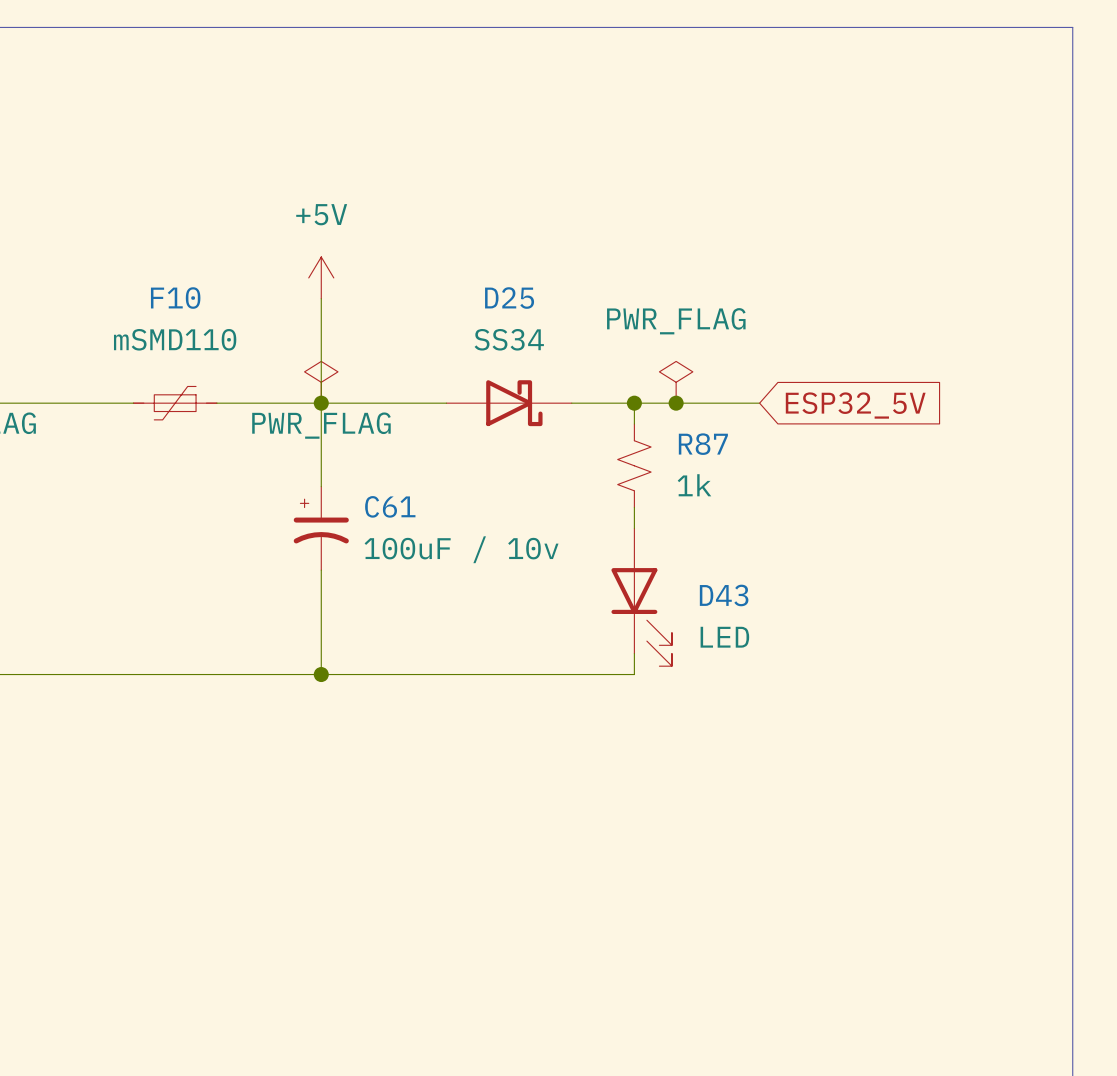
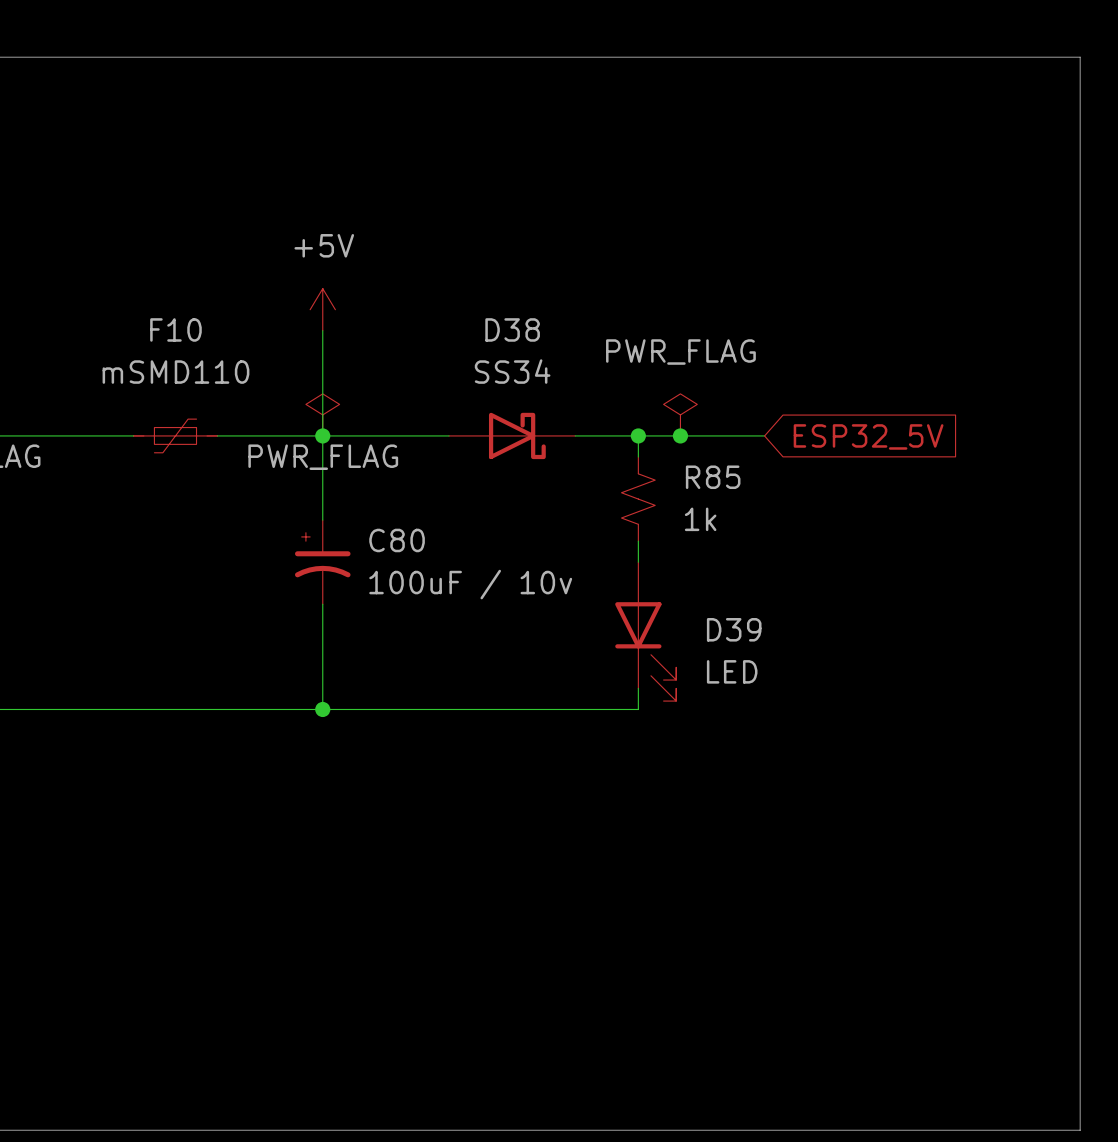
D25 name: D25 (509, 298) -> D38 (512, 329)
R87 name: R87 (703, 444) -> R85 (713, 477)
C61 name: C61 (390, 506) -> C80 (397, 540)
D43 name: D43 (724, 595) -> D39 (734, 629)

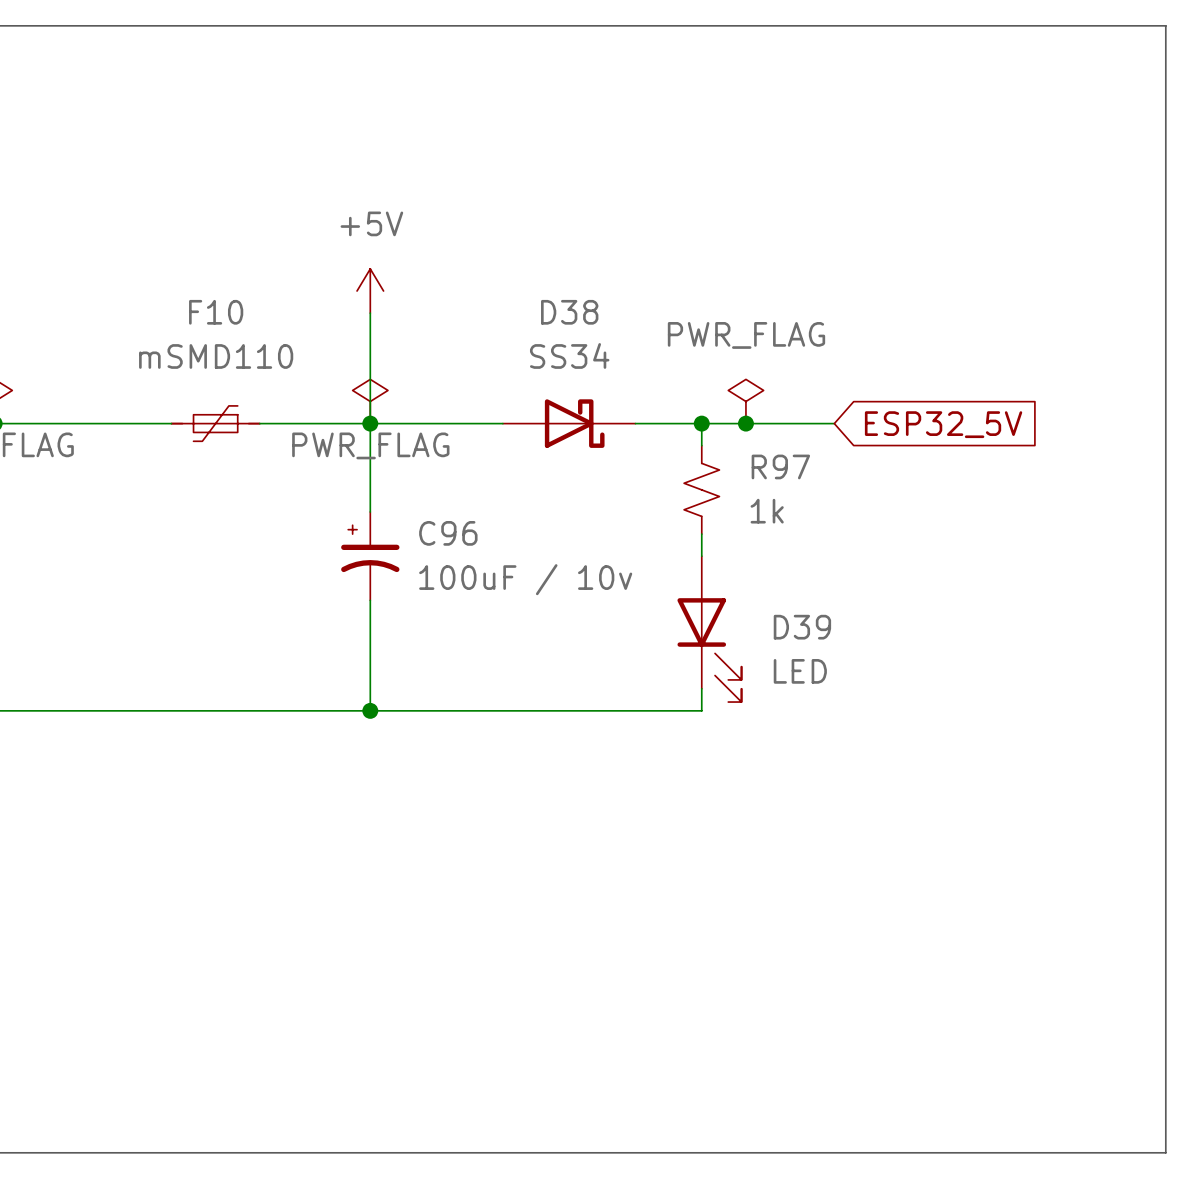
R85 name: R85 (713, 477) -> R97 (780, 466)
C80 name: C80 (397, 540) -> C96 (448, 533)

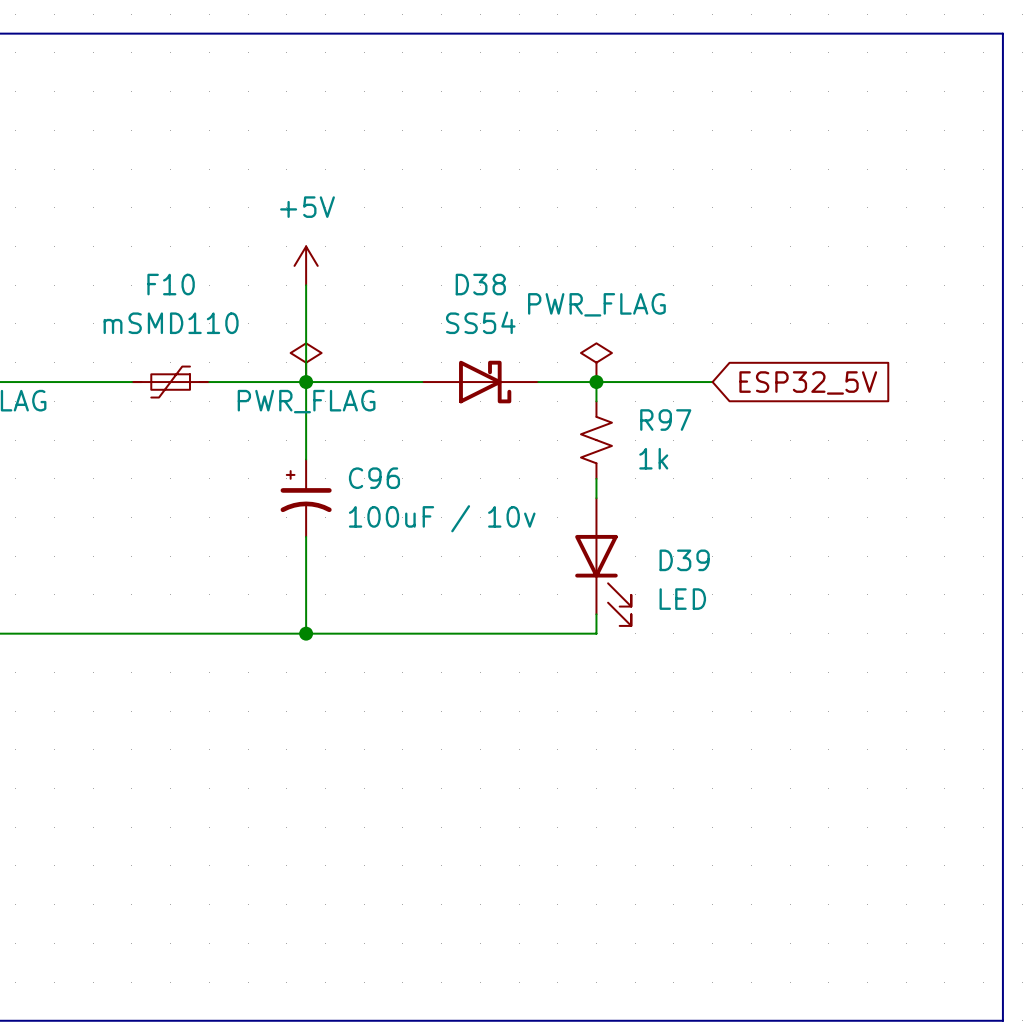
D38 value: SS34 (569, 355) -> SS54 (480, 322)
power symbol position: PWR_FLAG (745, 401) -> PWR_FLAG (596, 362)
junction: (745, 423) -> none

